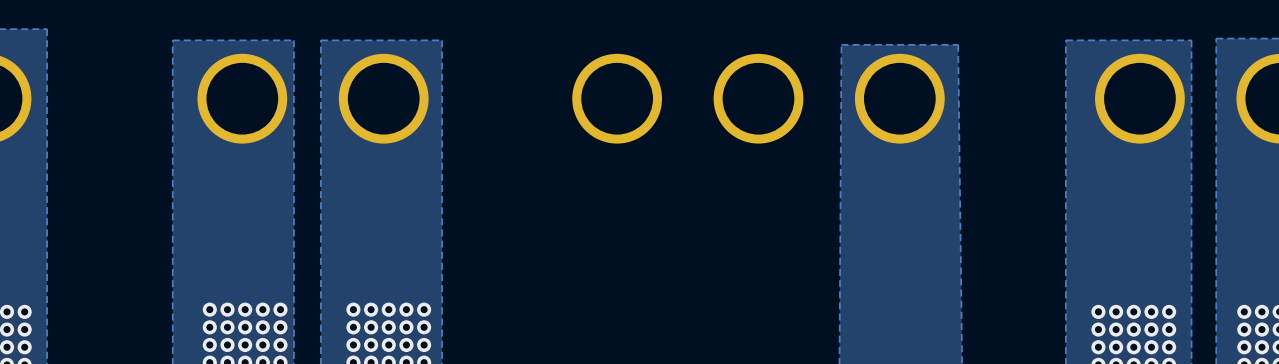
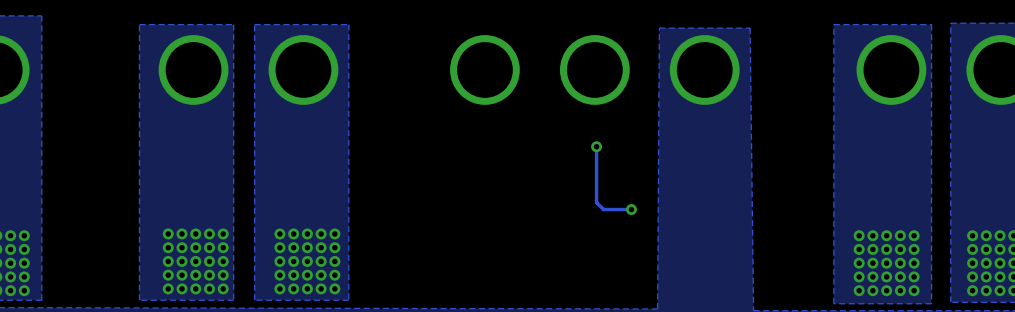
track: none -> (596, 146) (596, 202) (603, 209) (631, 209)
via: none -> (596, 146)
via: none -> (631, 209)

